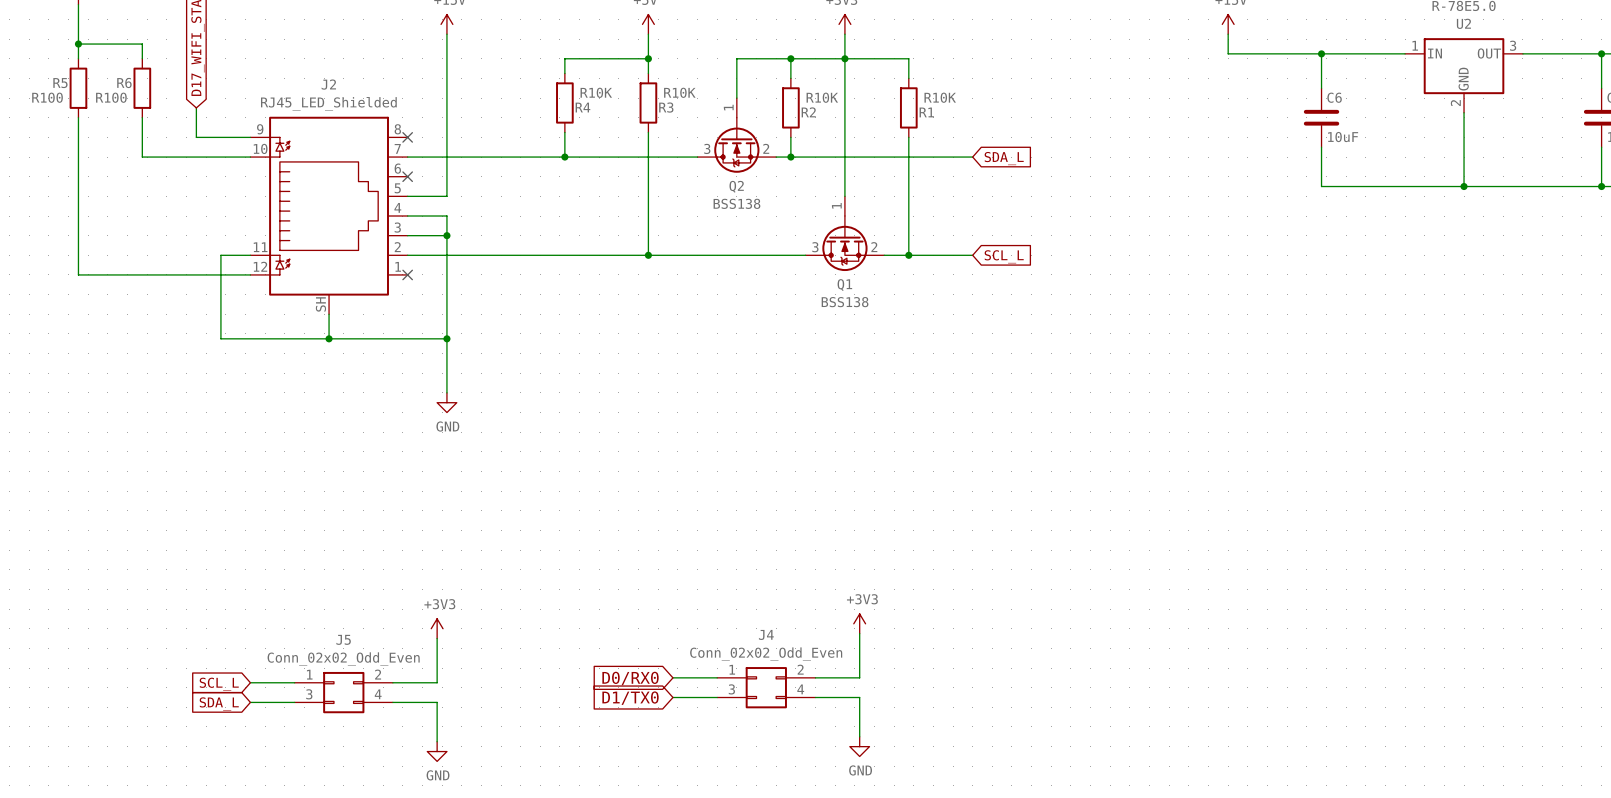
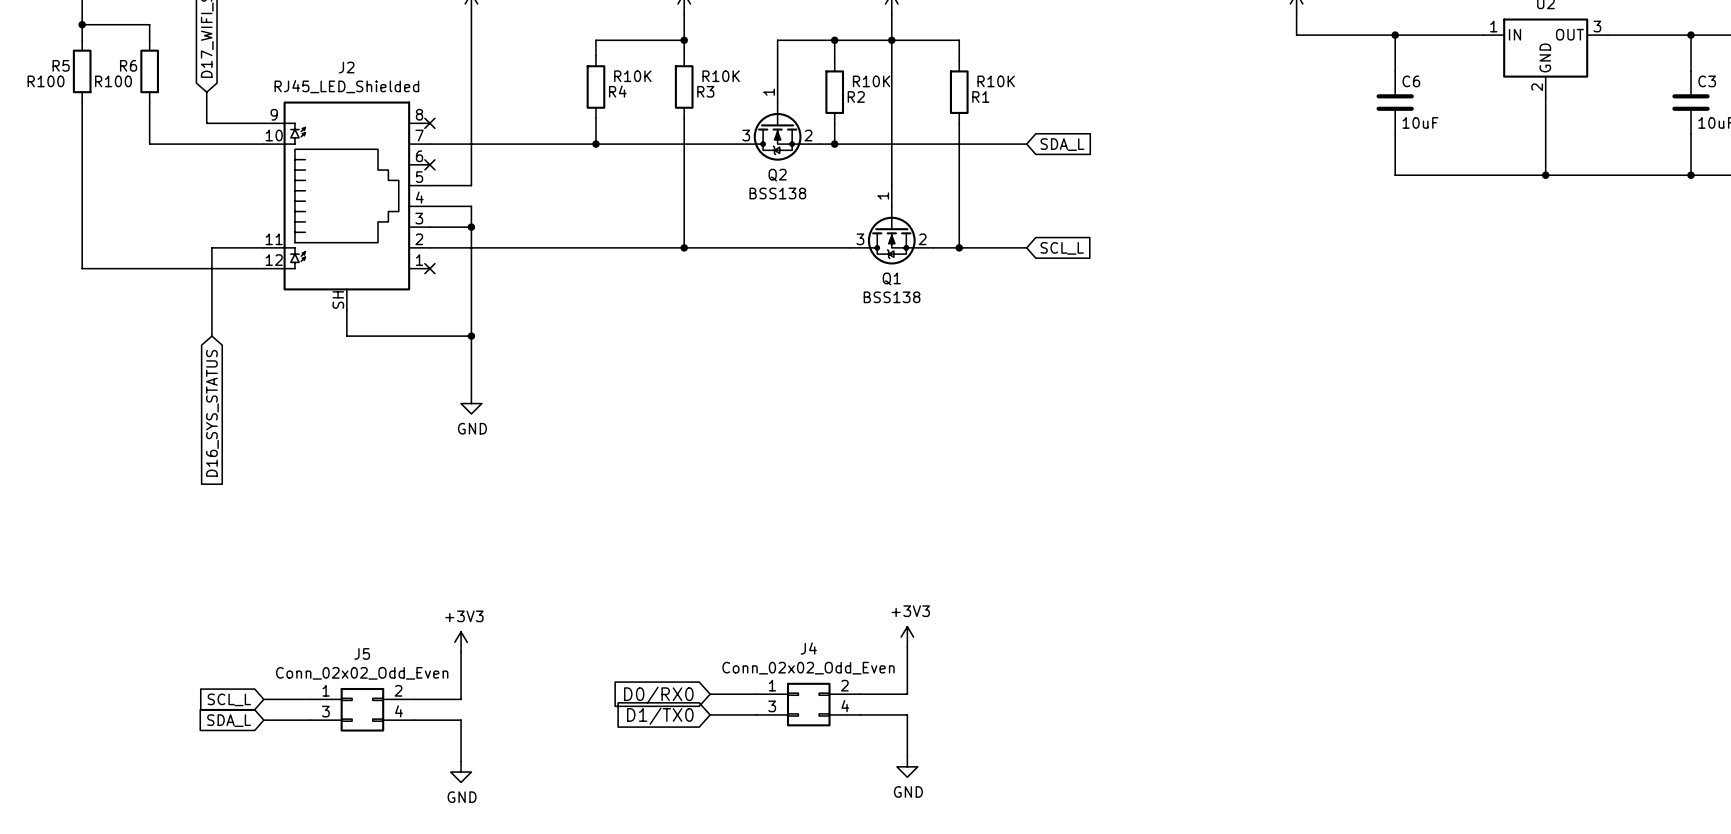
wire: (220, 255) (220, 338) (329, 338) -> (232, 247) (211, 247) (211, 336)
junction: (329, 338) -> none
global label: none -> D16_SYS_STATUS (212, 413)

